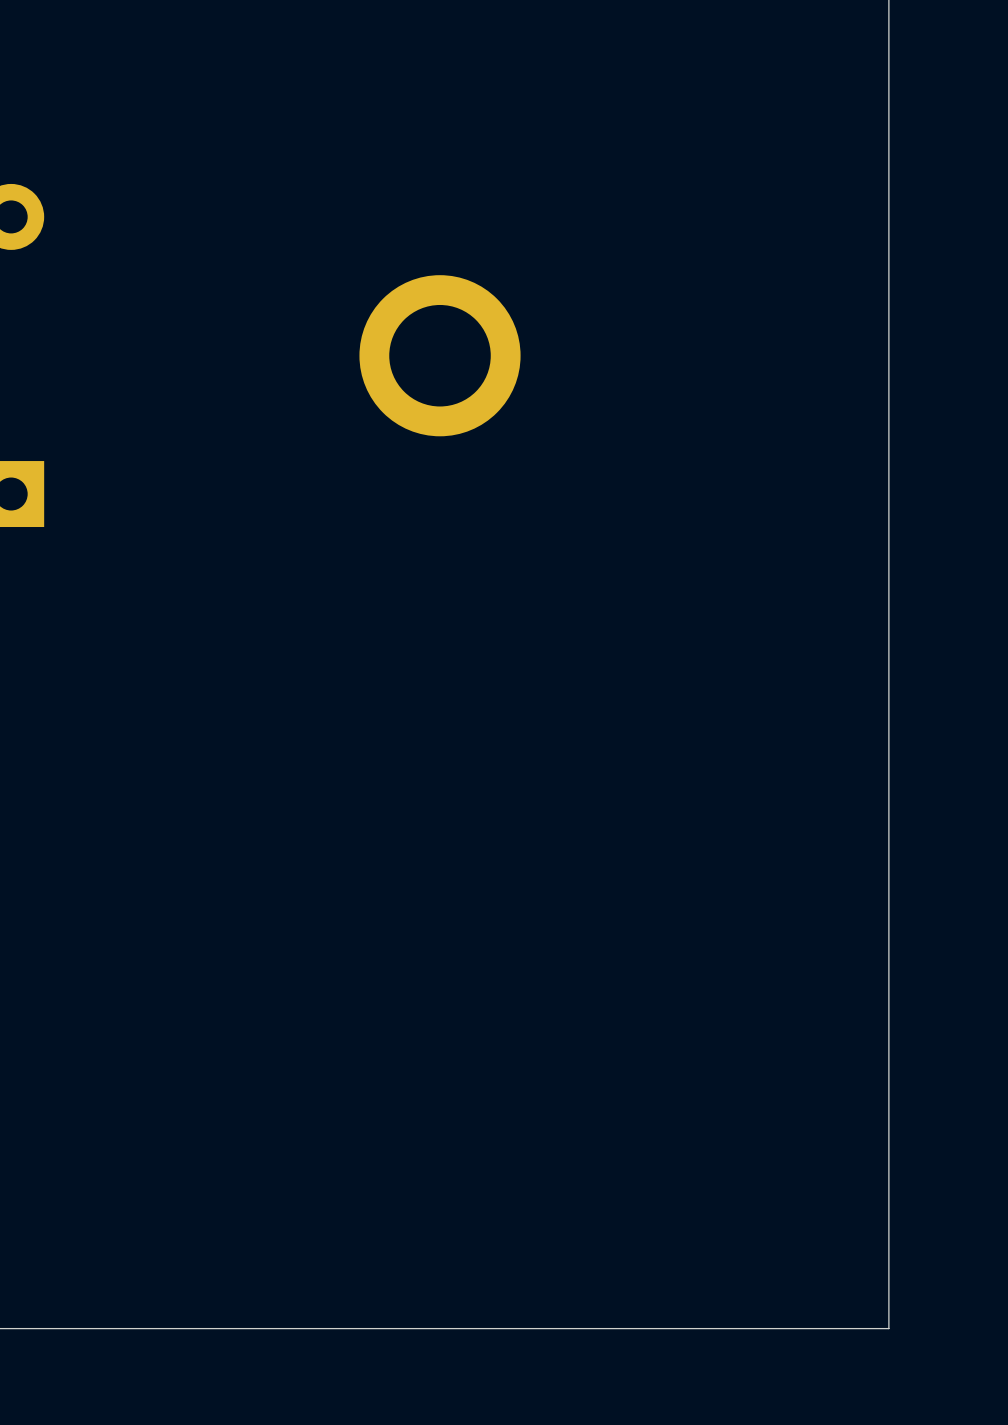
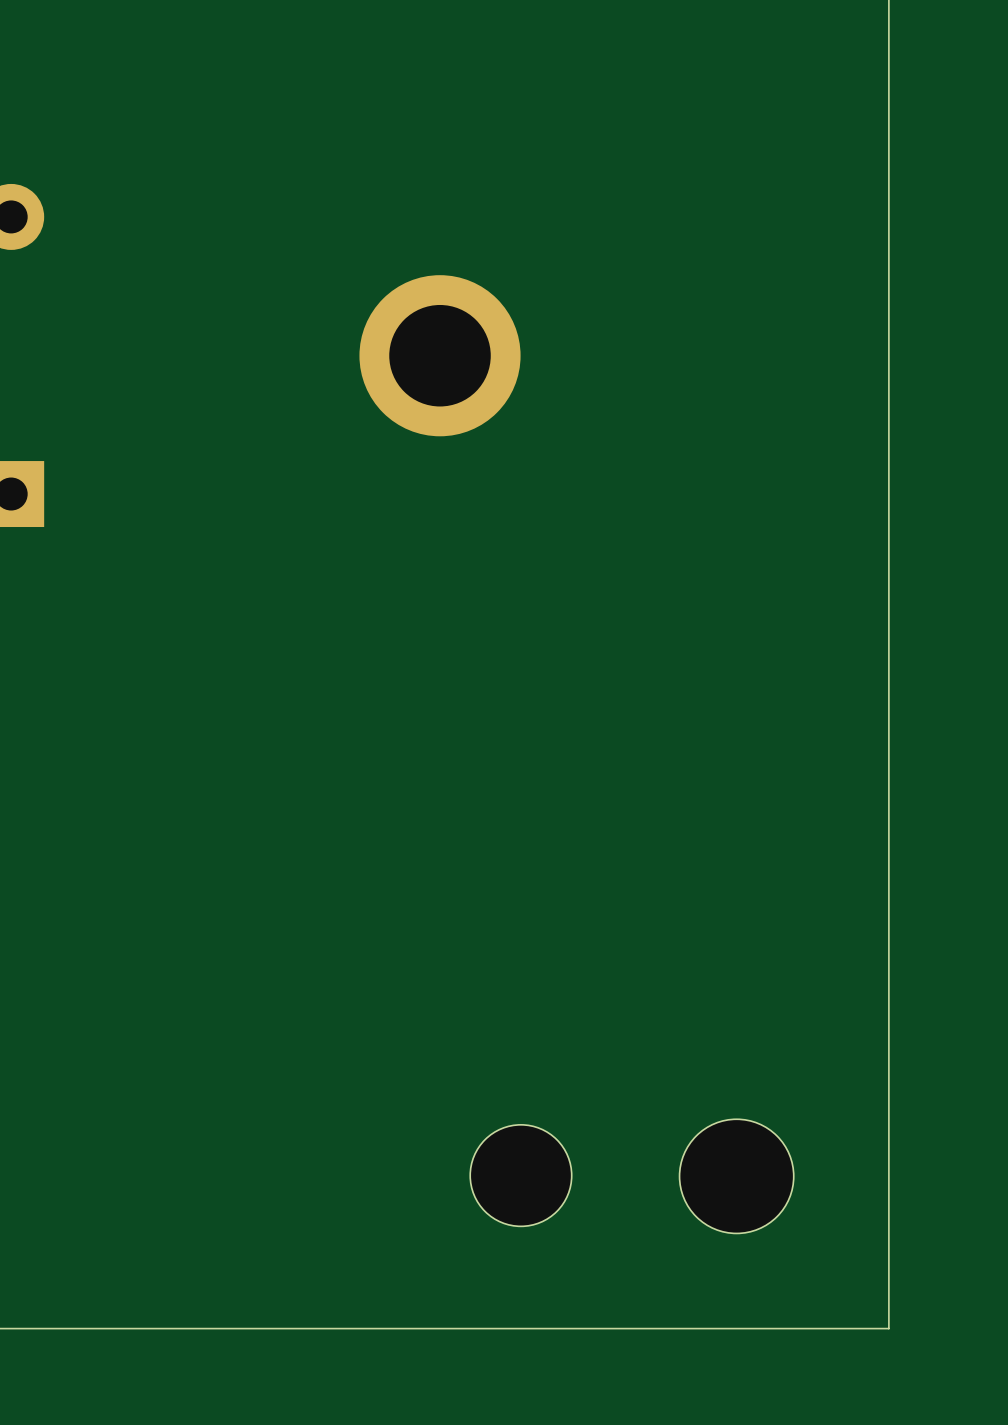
part: none -> (520, 1175)
part: none -> (736, 1176)

